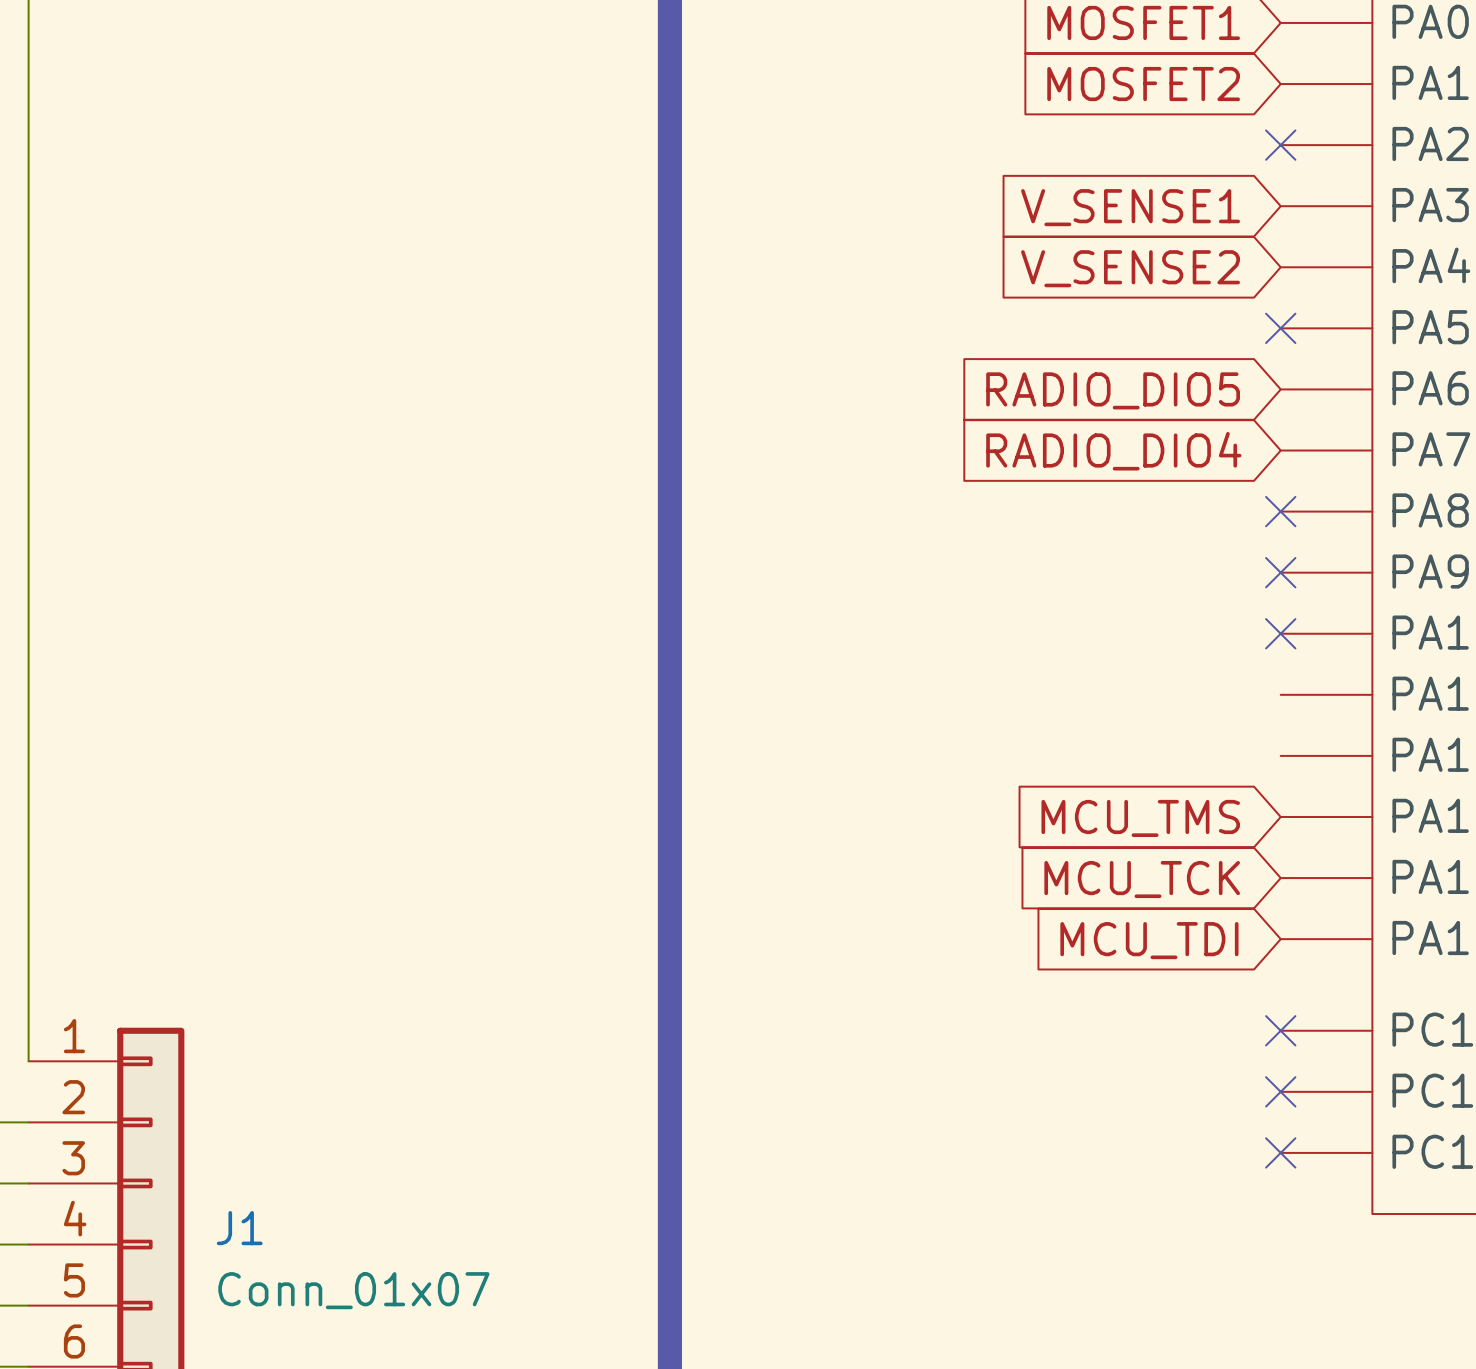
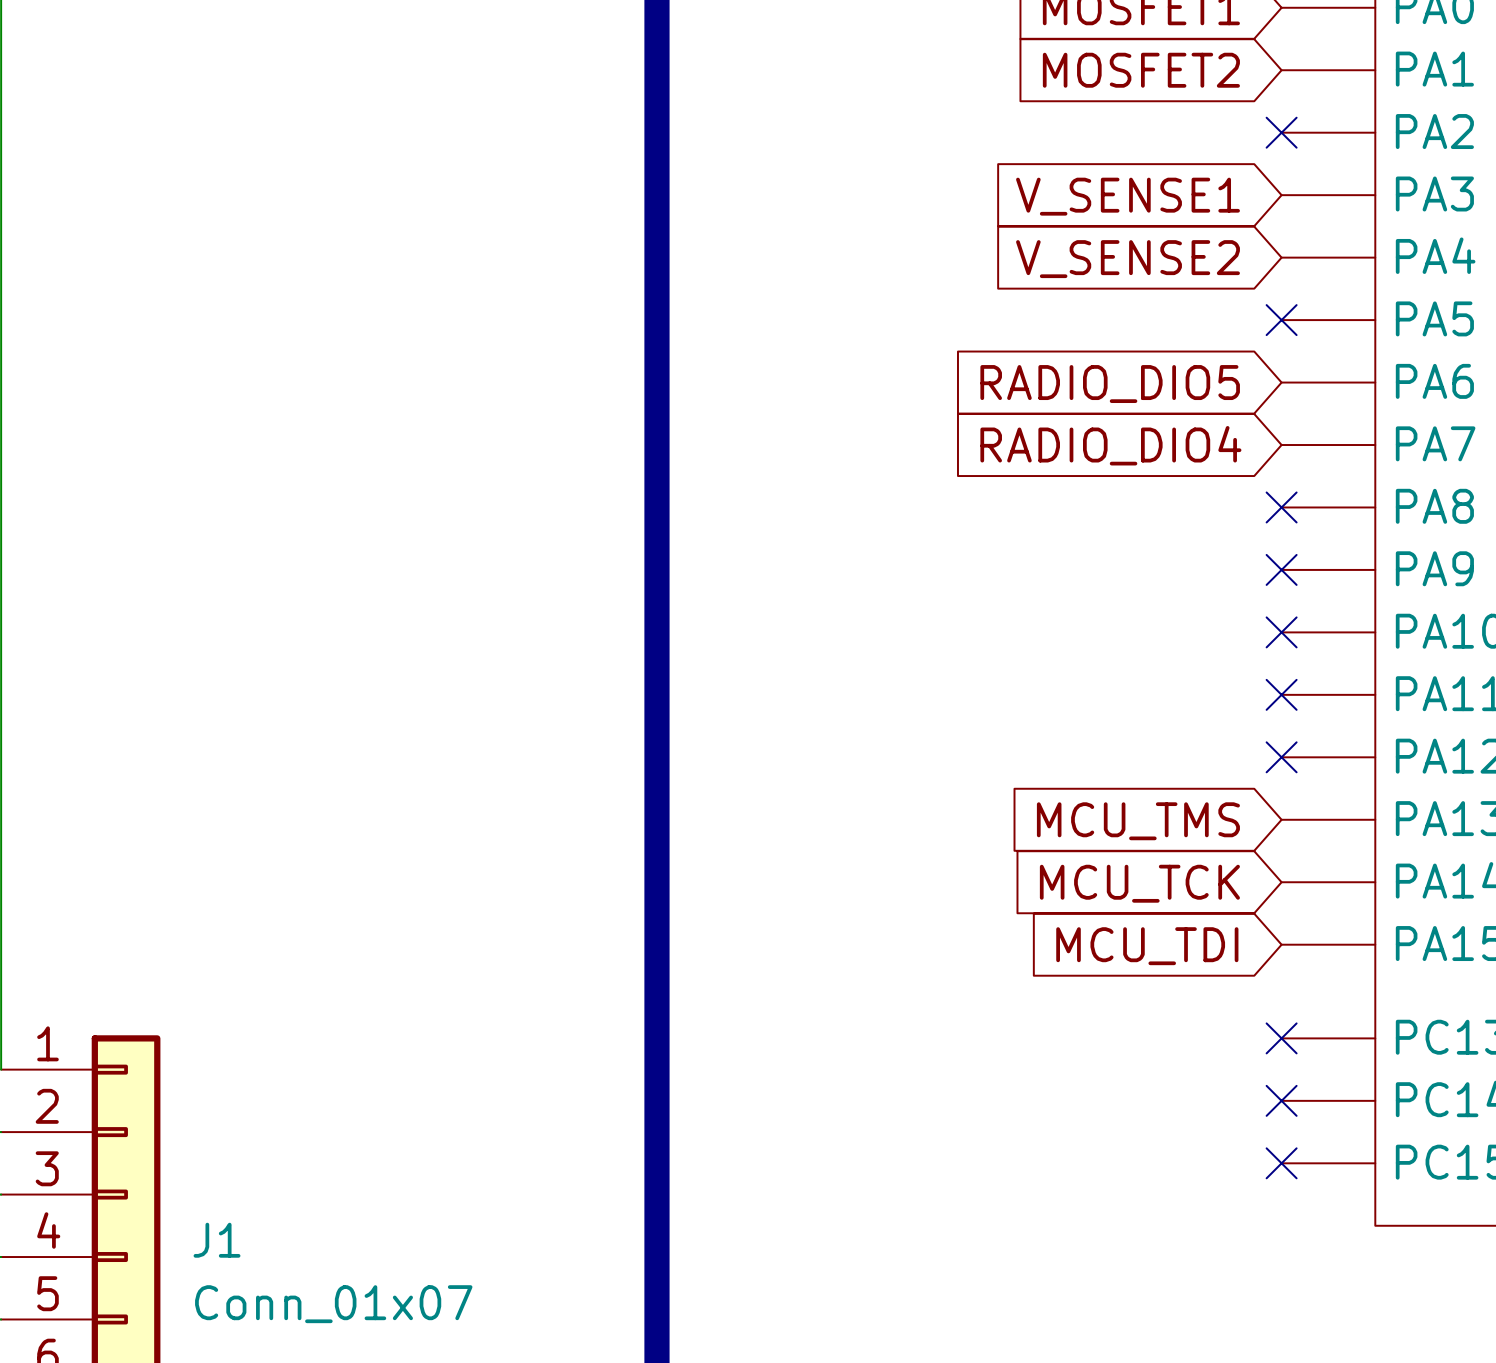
no-connect mark: none -> (1281, 694)
no-connect mark: none -> (1281, 757)

